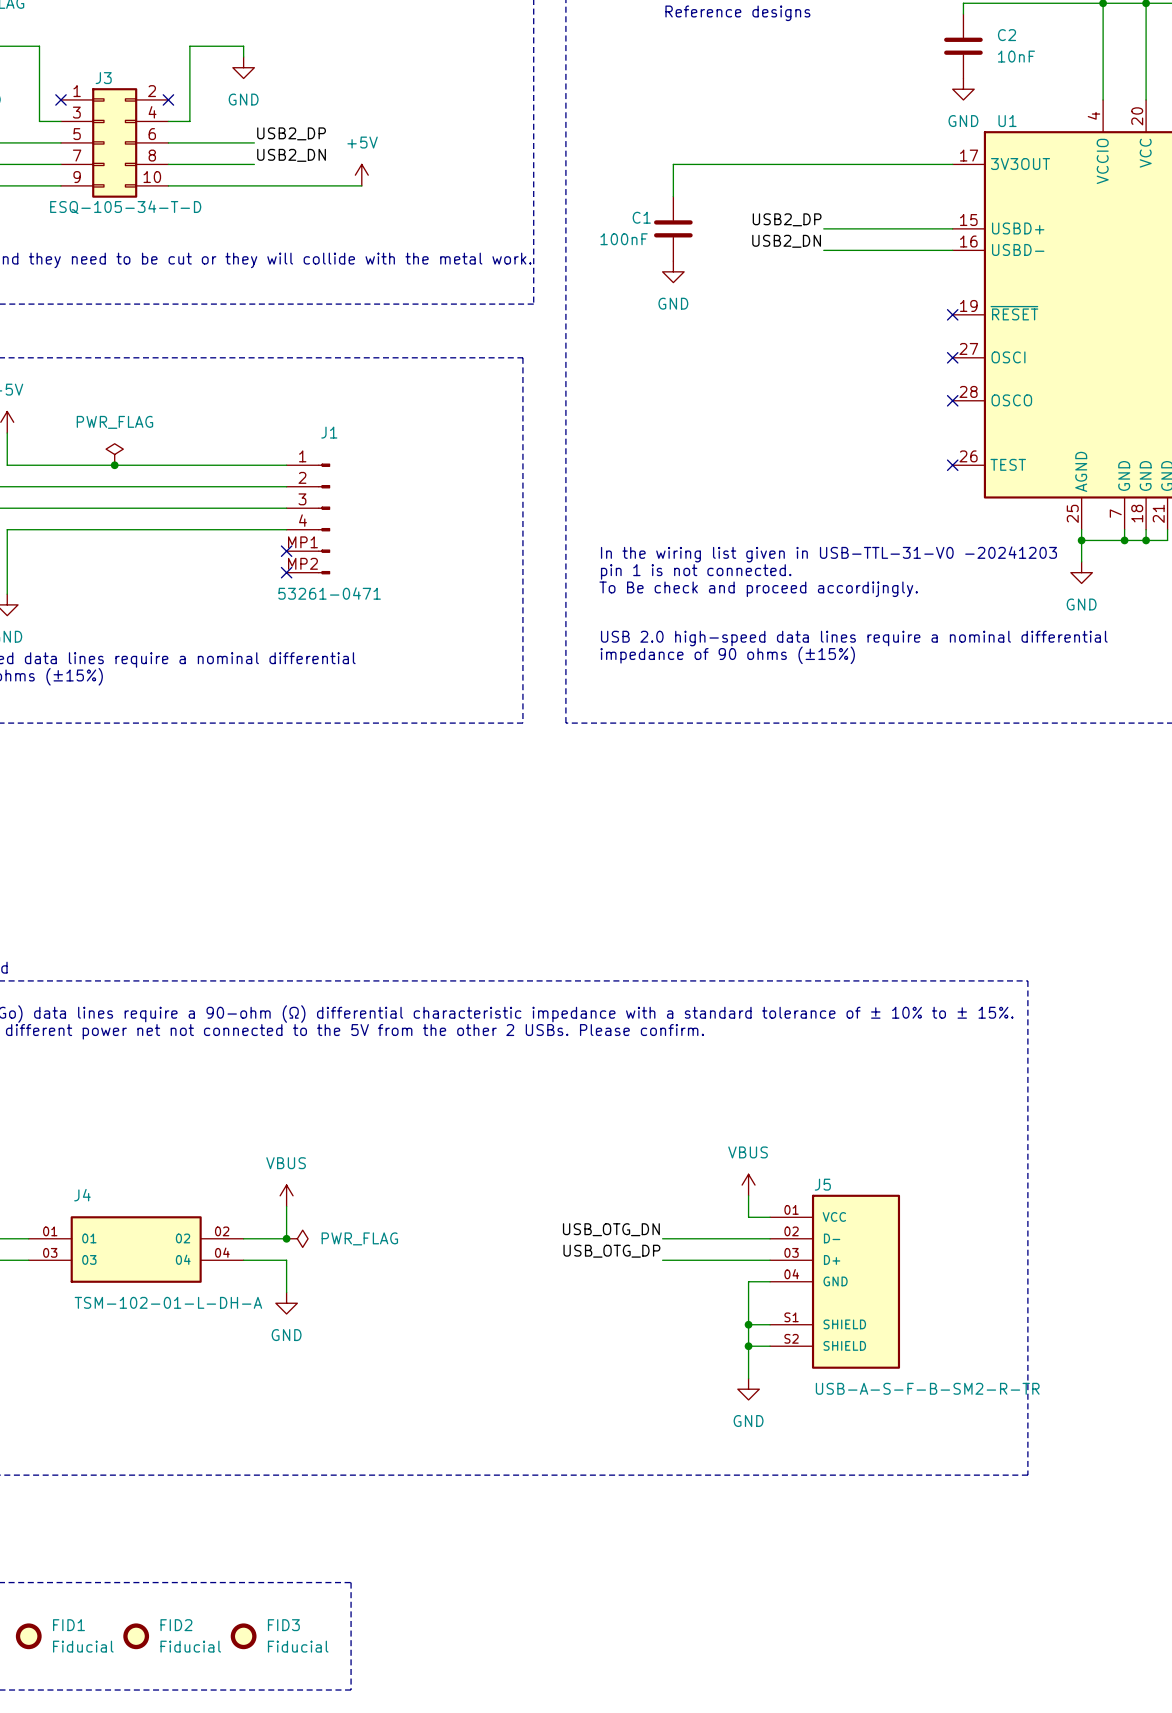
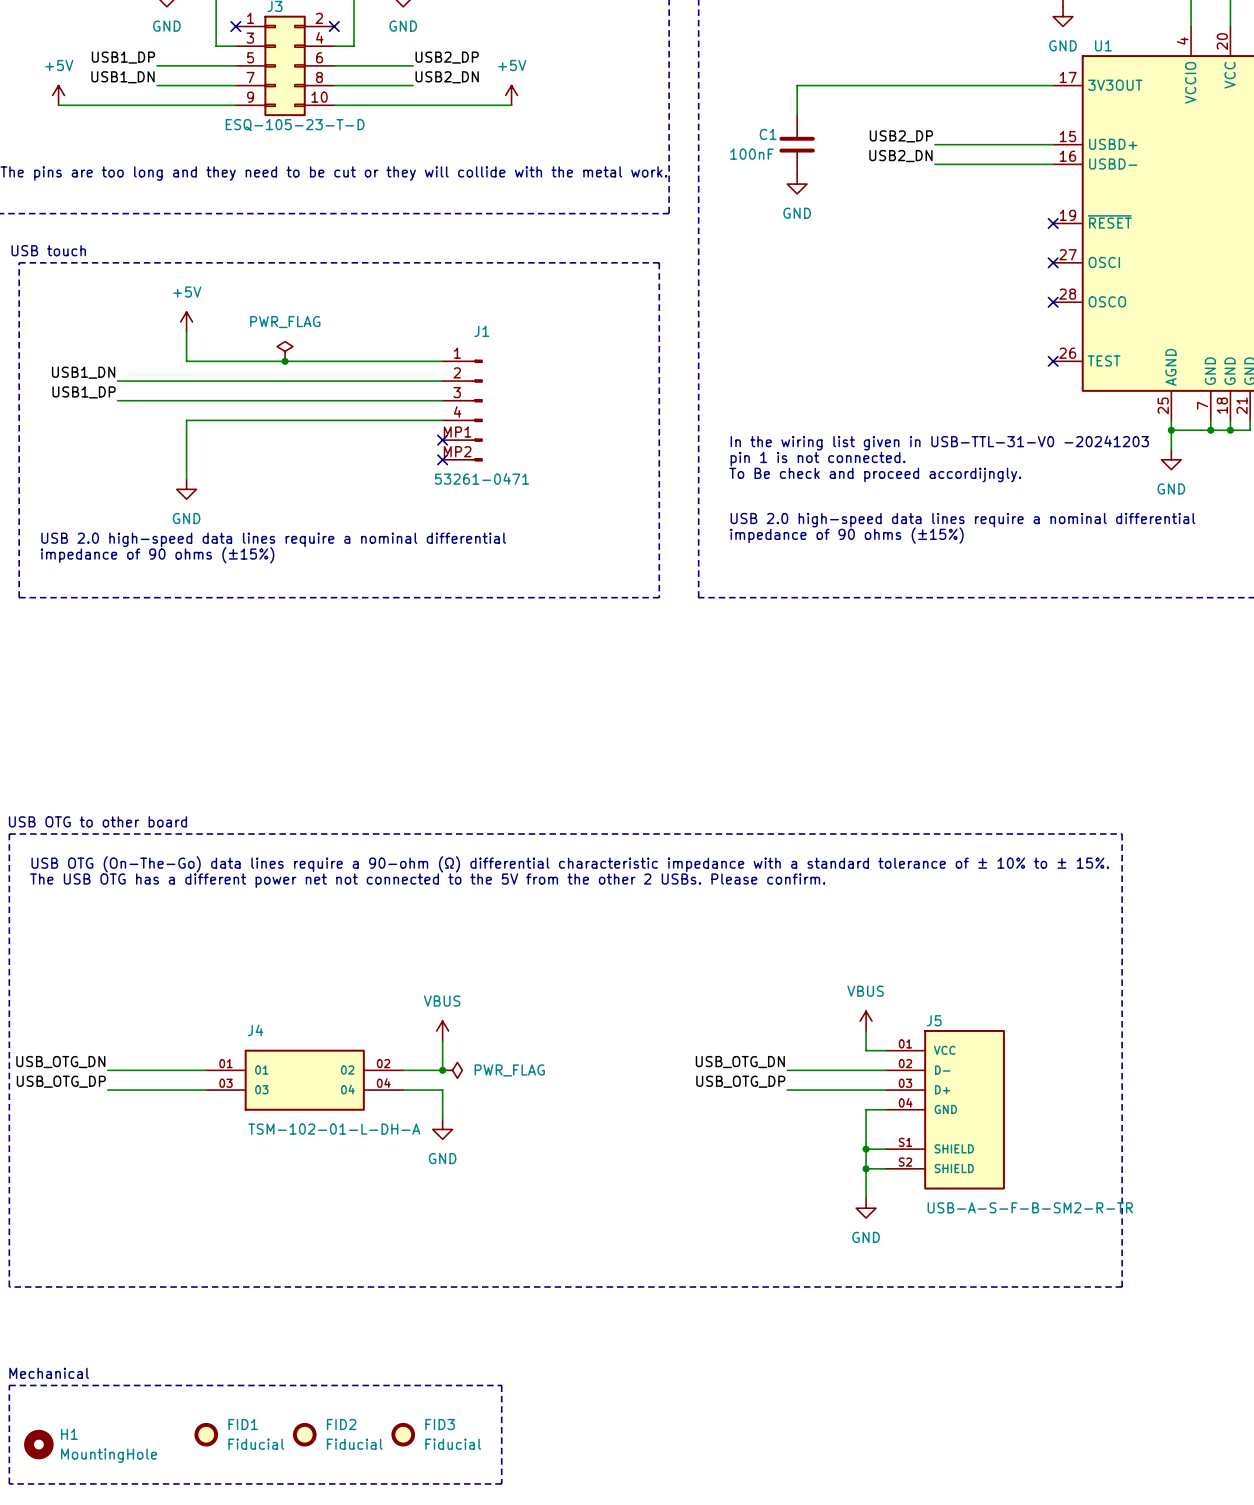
J3 value: ESQ-105-34-T-D (125, 207) -> ESQ-105-23-T-D (295, 125)

